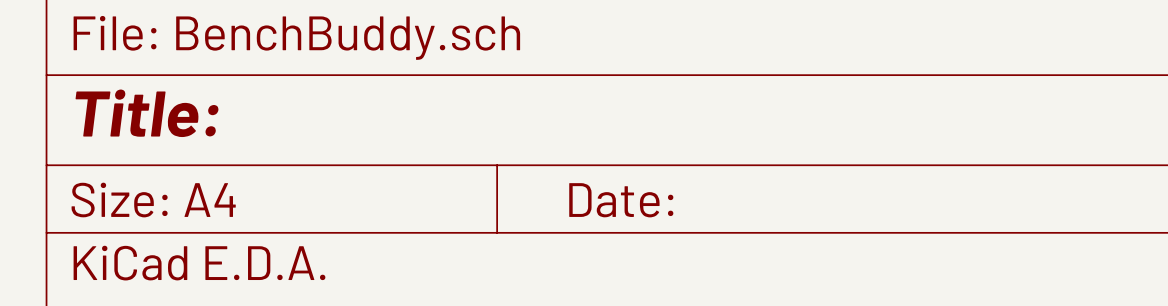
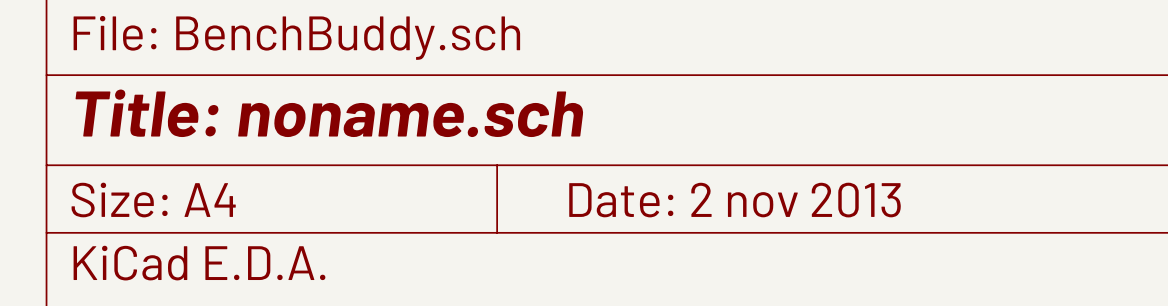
title block: Title: (147, 113) -> Title: noname.sch (329, 113)
title block: Date: (621, 200) -> Date: 2 nov 2013 (735, 200)

